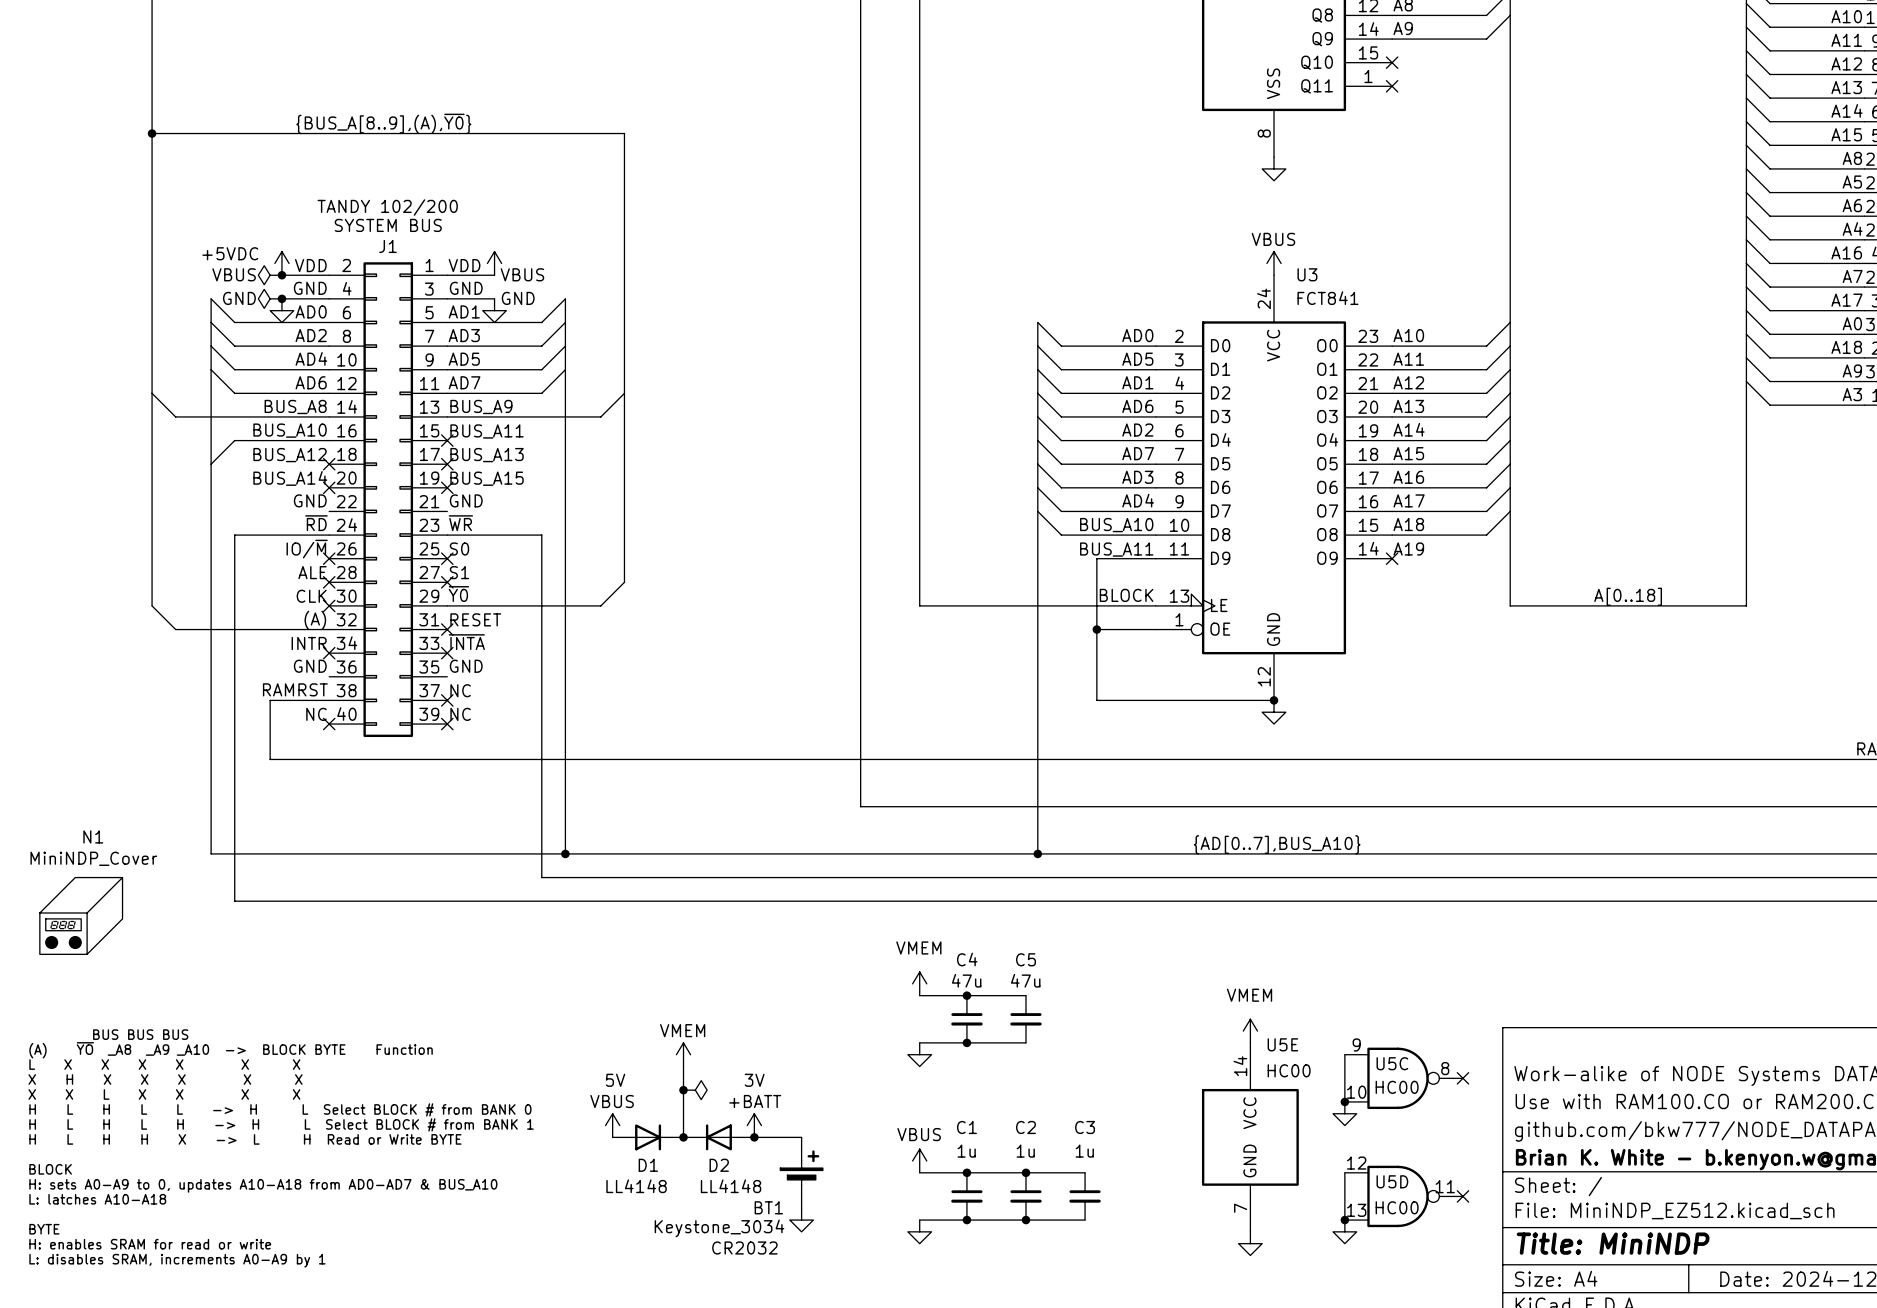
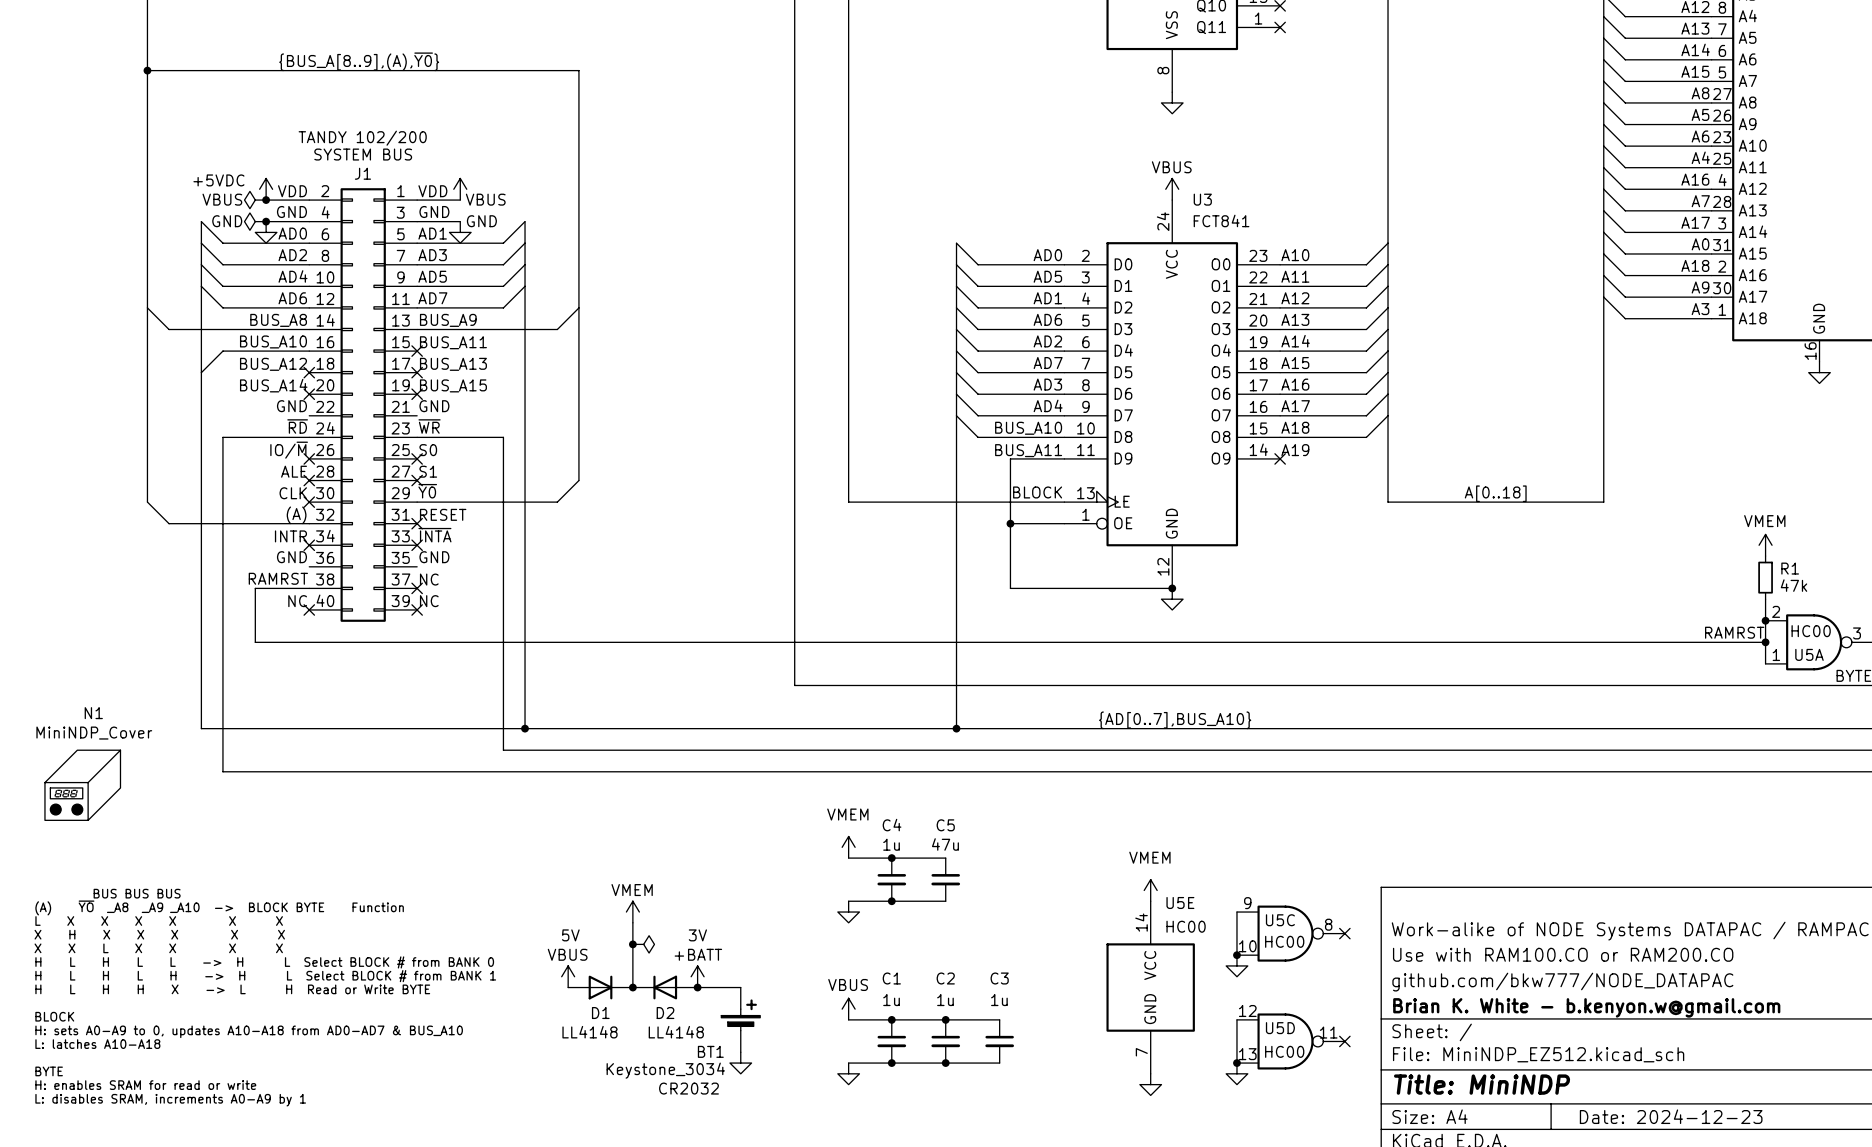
C4 value: 47u (966, 980) -> 1u (891, 844)

